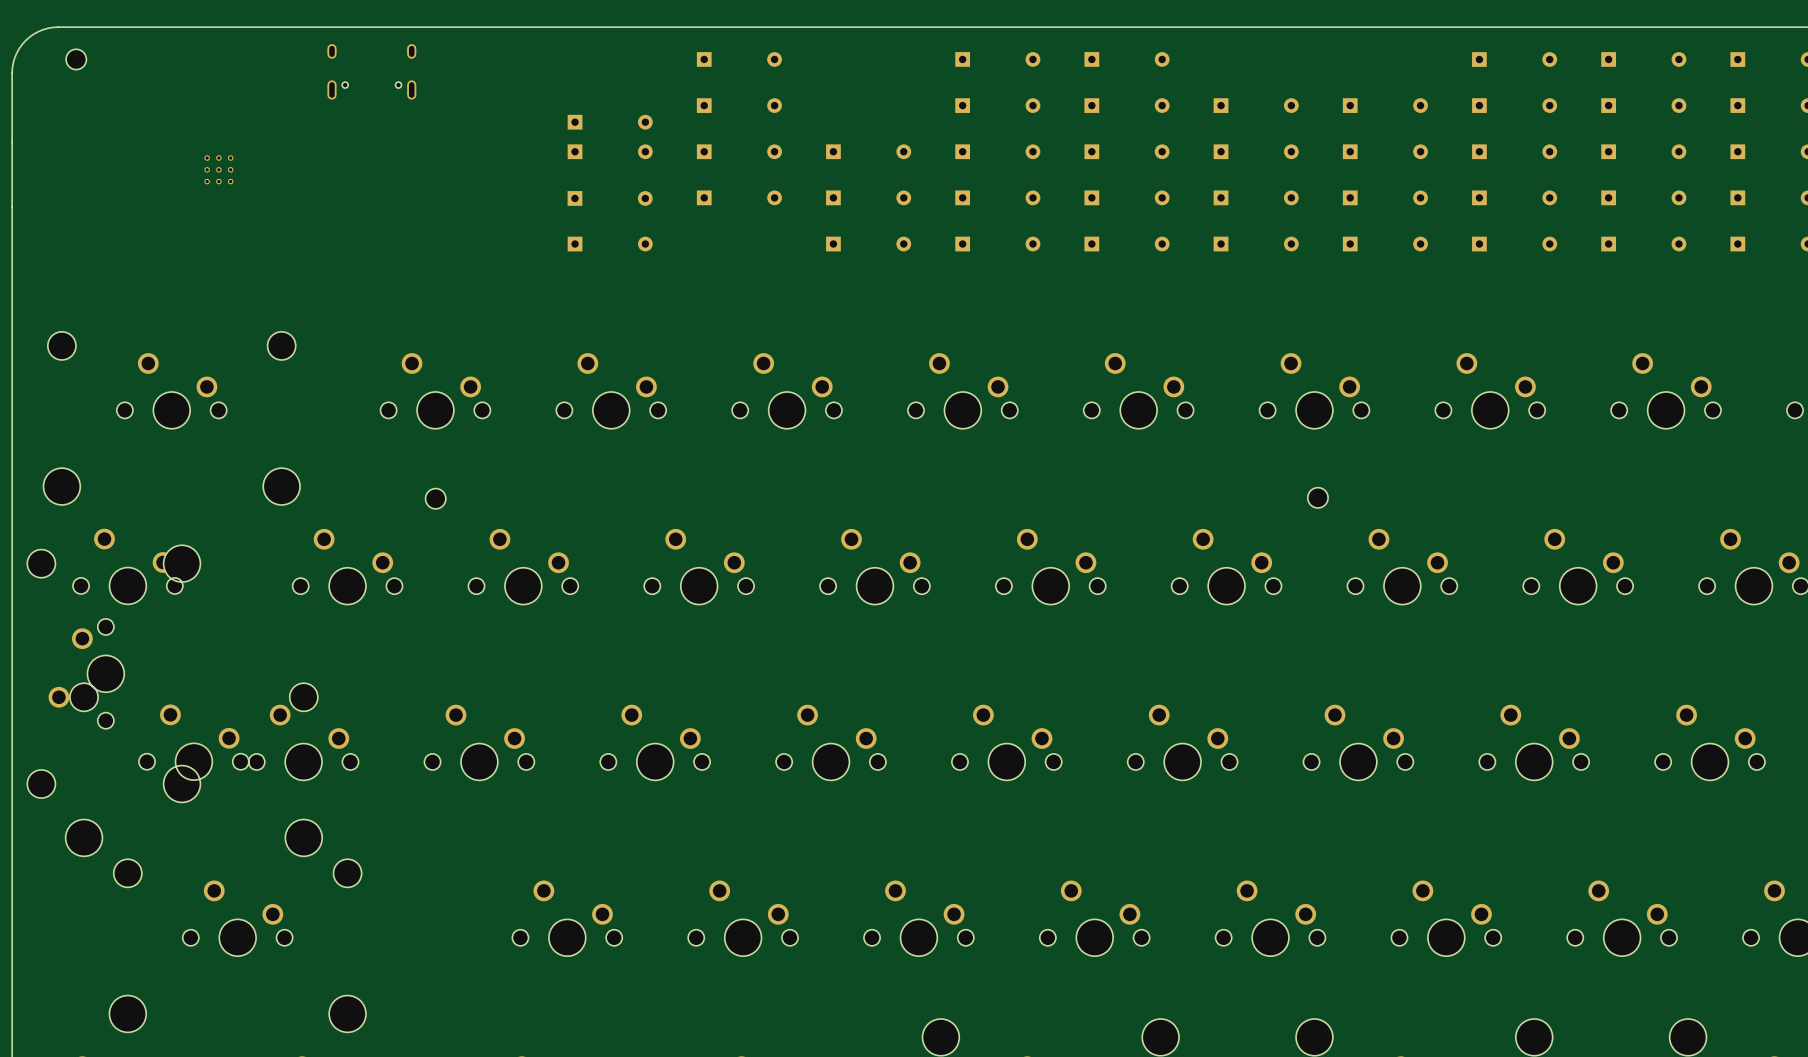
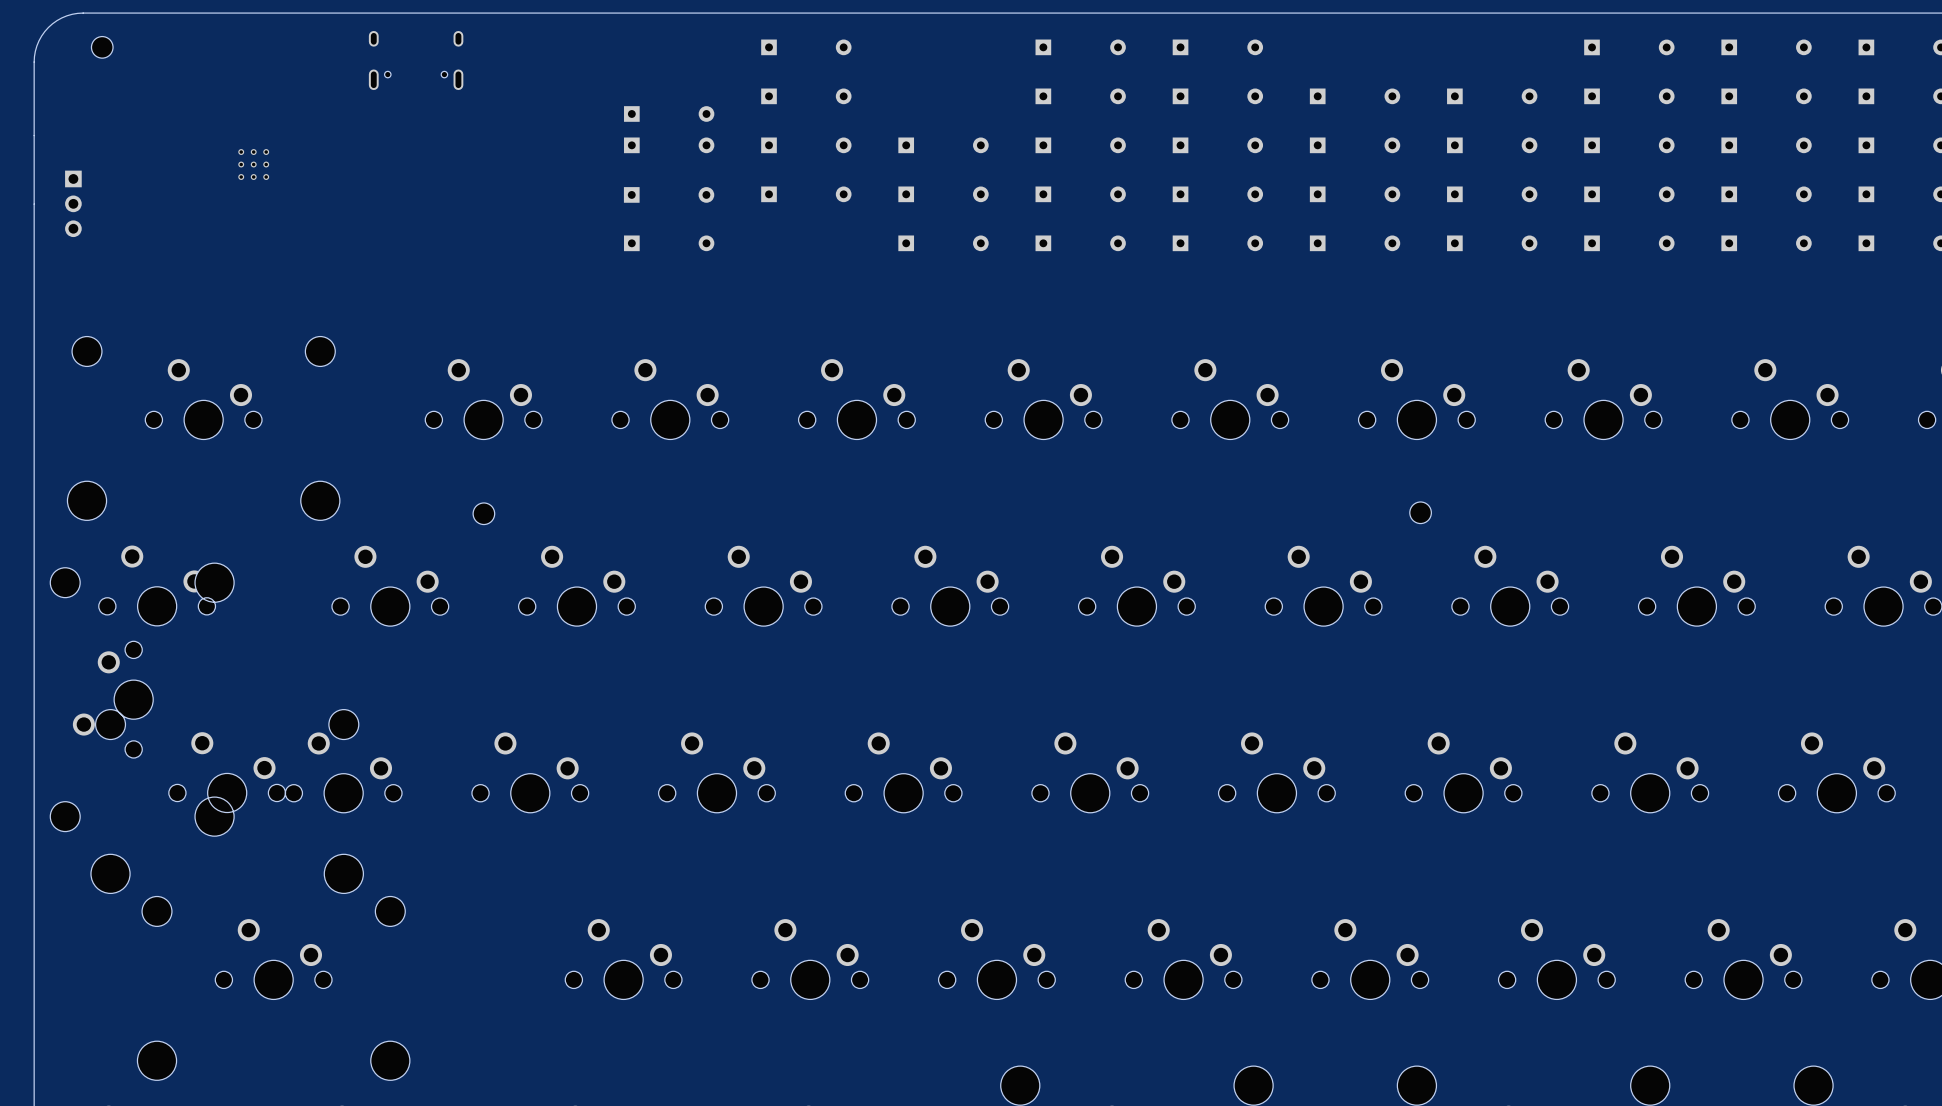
part: none -> (73, 203)

